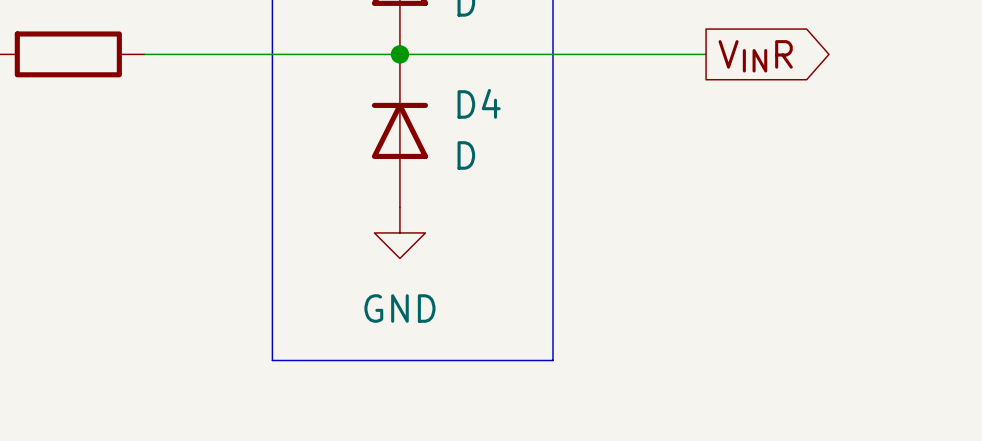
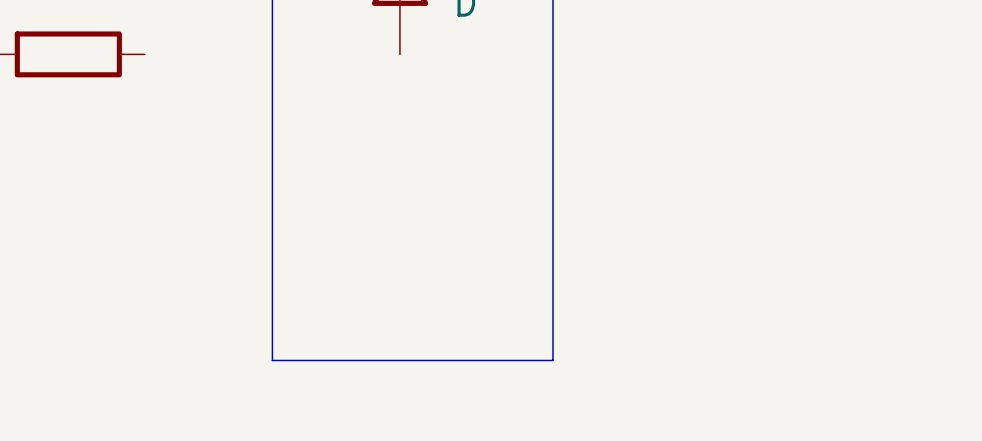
wire: (144, 54) (706, 54) -> none
junction: (399, 54) -> none
global label: VINR (755, 56) -> none
D4: D (399, 130) -> none
power symbol: GND (399, 232) -> none

